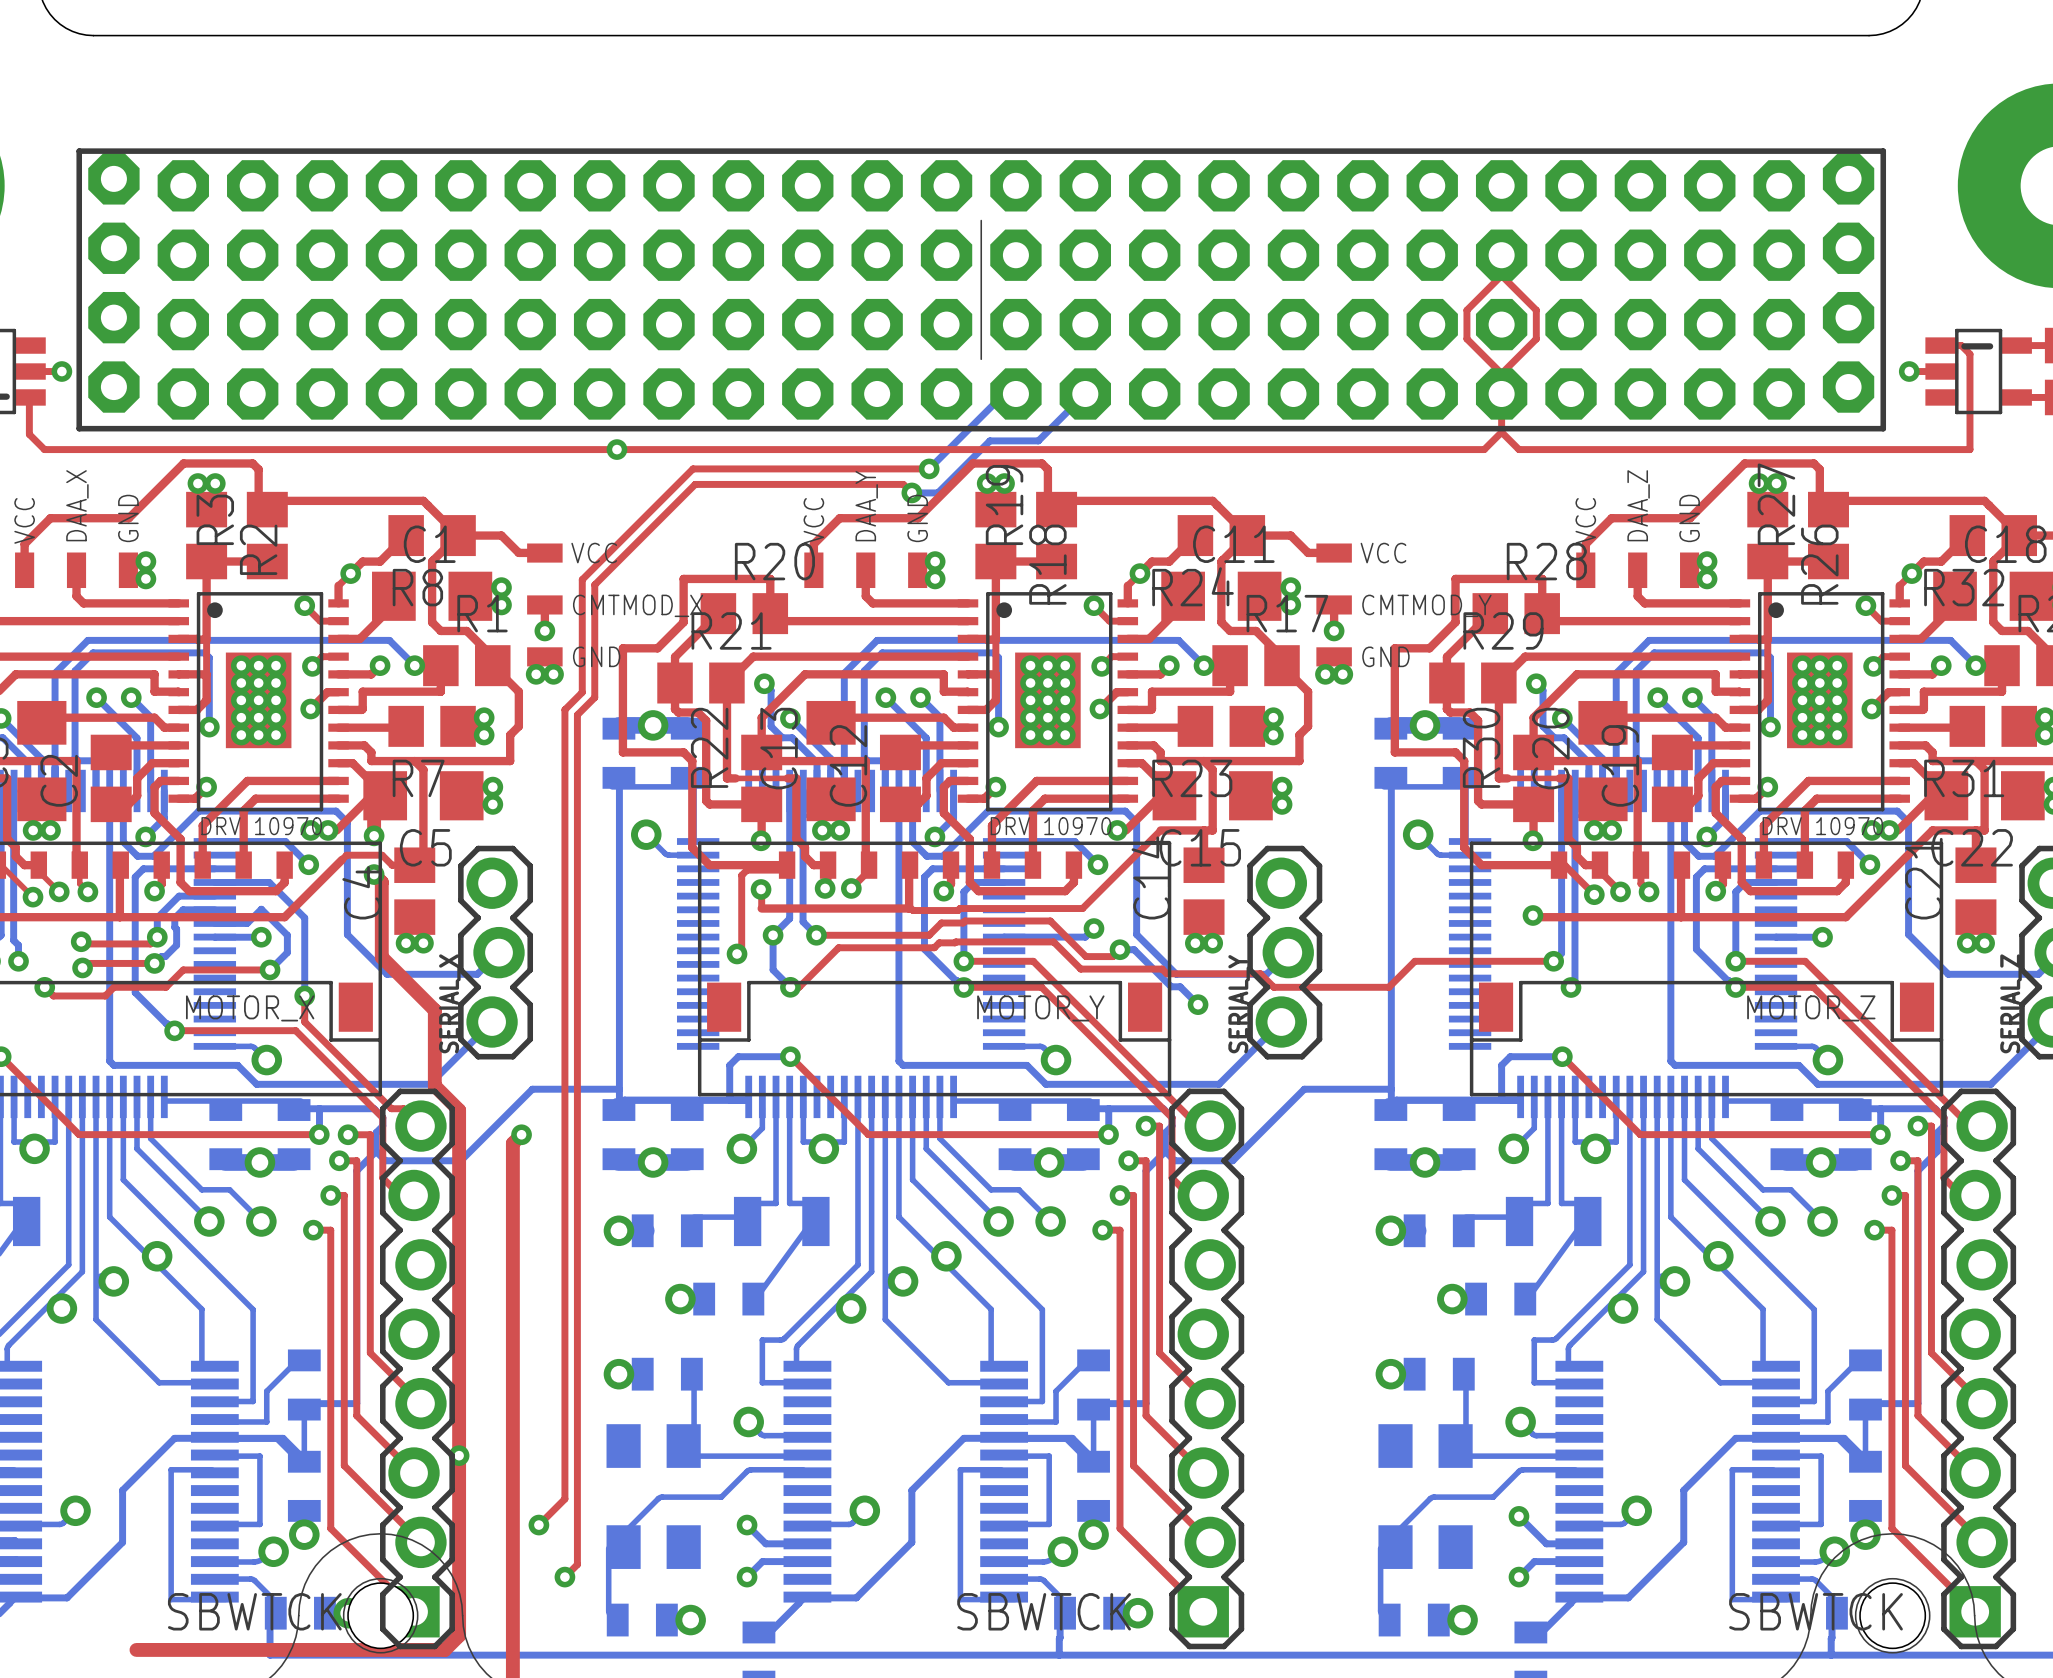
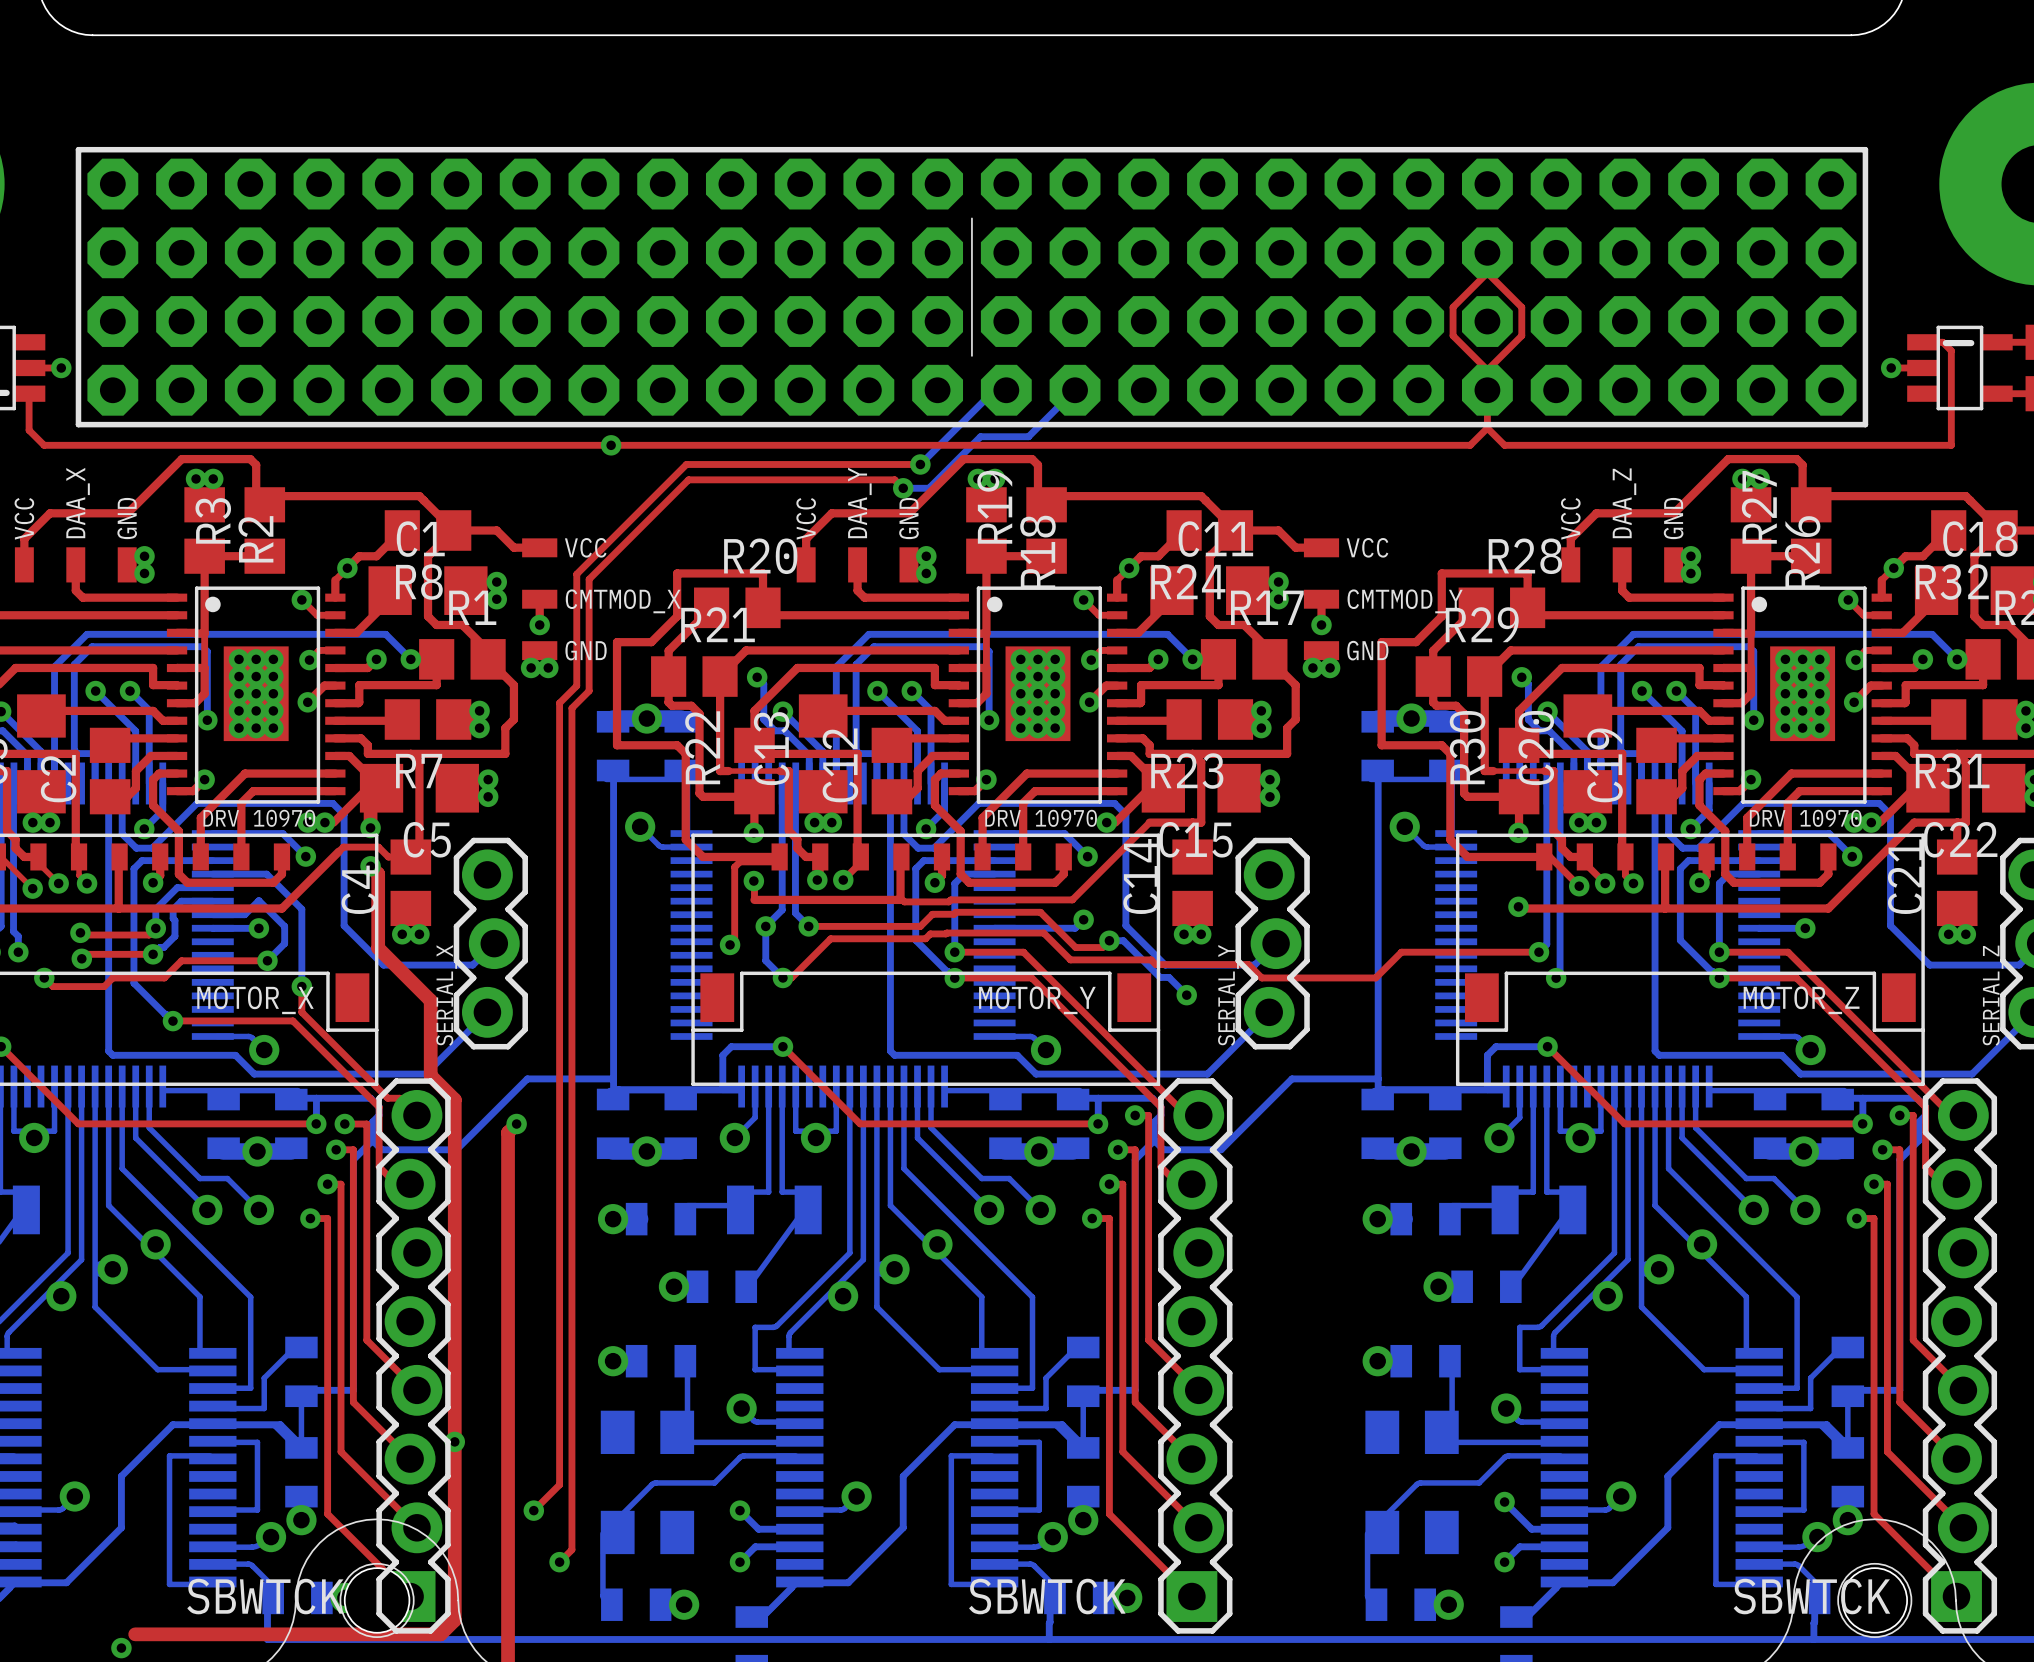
part footprint: [76, 148, 1887, 432] -> [75, 146, 1869, 428]
via: none -> (121, 1648)

